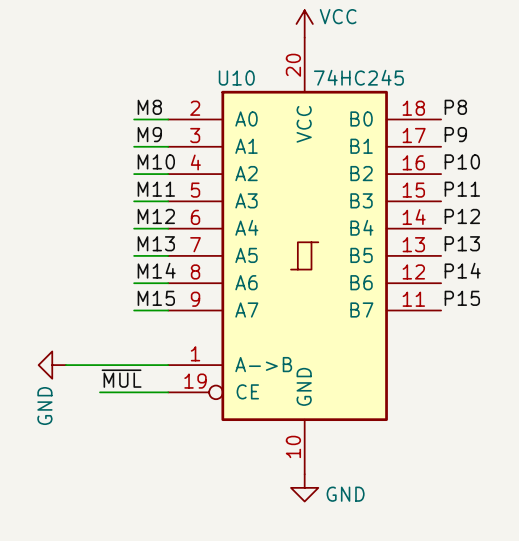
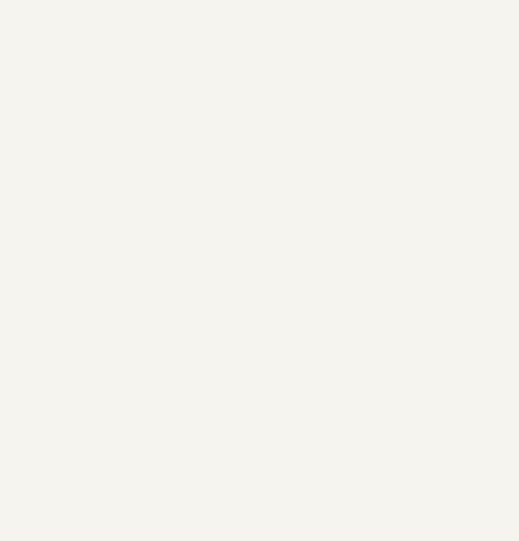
power symbol: VCC (304, 23) -> none
label: M8 (149, 107) -> none
label: P8 (455, 107) -> none
wire: (134, 119) (168, 119) -> none
label: M9 (149, 134) -> none
label: P9 (455, 134) -> none
wire: (134, 146) (168, 146) -> none
label: M10 (156, 161) -> none
label: P10 (462, 161) -> none
wire: (134, 174) (168, 174) -> none
label: M11 (156, 189) -> none
label: P11 (462, 189) -> none
wire: (134, 201) (168, 201) -> none
label: M12 (156, 216) -> none
label: P12 (462, 216) -> none
wire: (134, 228) (168, 228) -> none
label: M13 (156, 243) -> none
label: P13 (462, 243) -> none
wire: (134, 255) (168, 255) -> none
U10: 74HC245 (304, 255) -> none
label: M14 (156, 270) -> none
label: P14 (462, 270) -> none
wire: (134, 283) (168, 283) -> none
label: M15 (156, 298) -> none
label: P15 (462, 298) -> none
wire: (134, 310) (168, 310) -> none
power symbol: GND (52, 365) -> none
wire: (65, 365) (168, 365) -> none
label: ~{MUL} (121, 378) -> none
wire: (100, 392) (168, 392) -> none
power symbol: GND (304, 487) -> none

